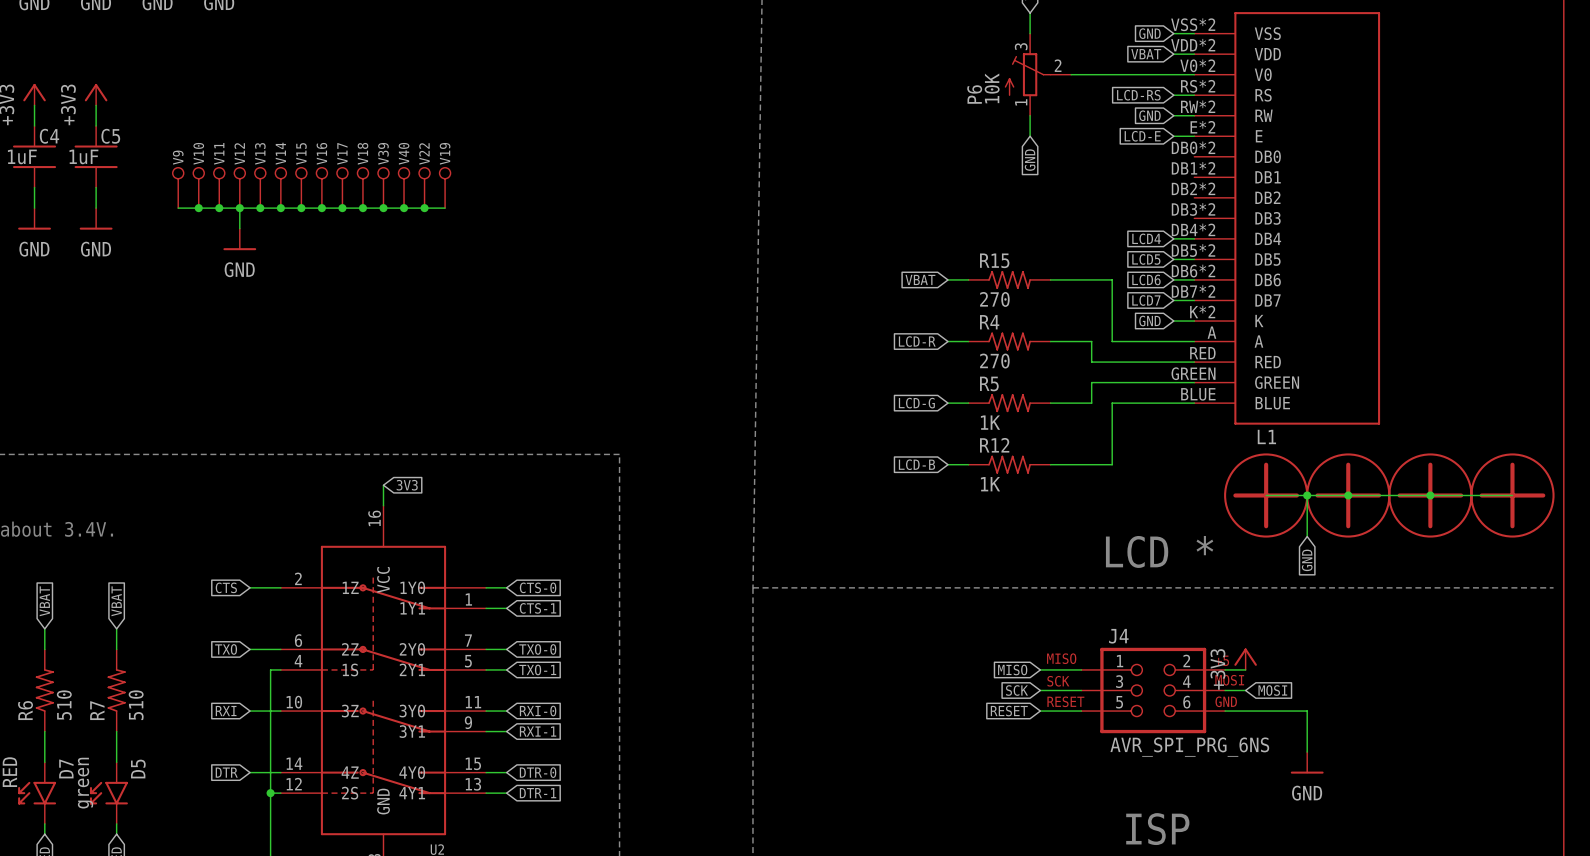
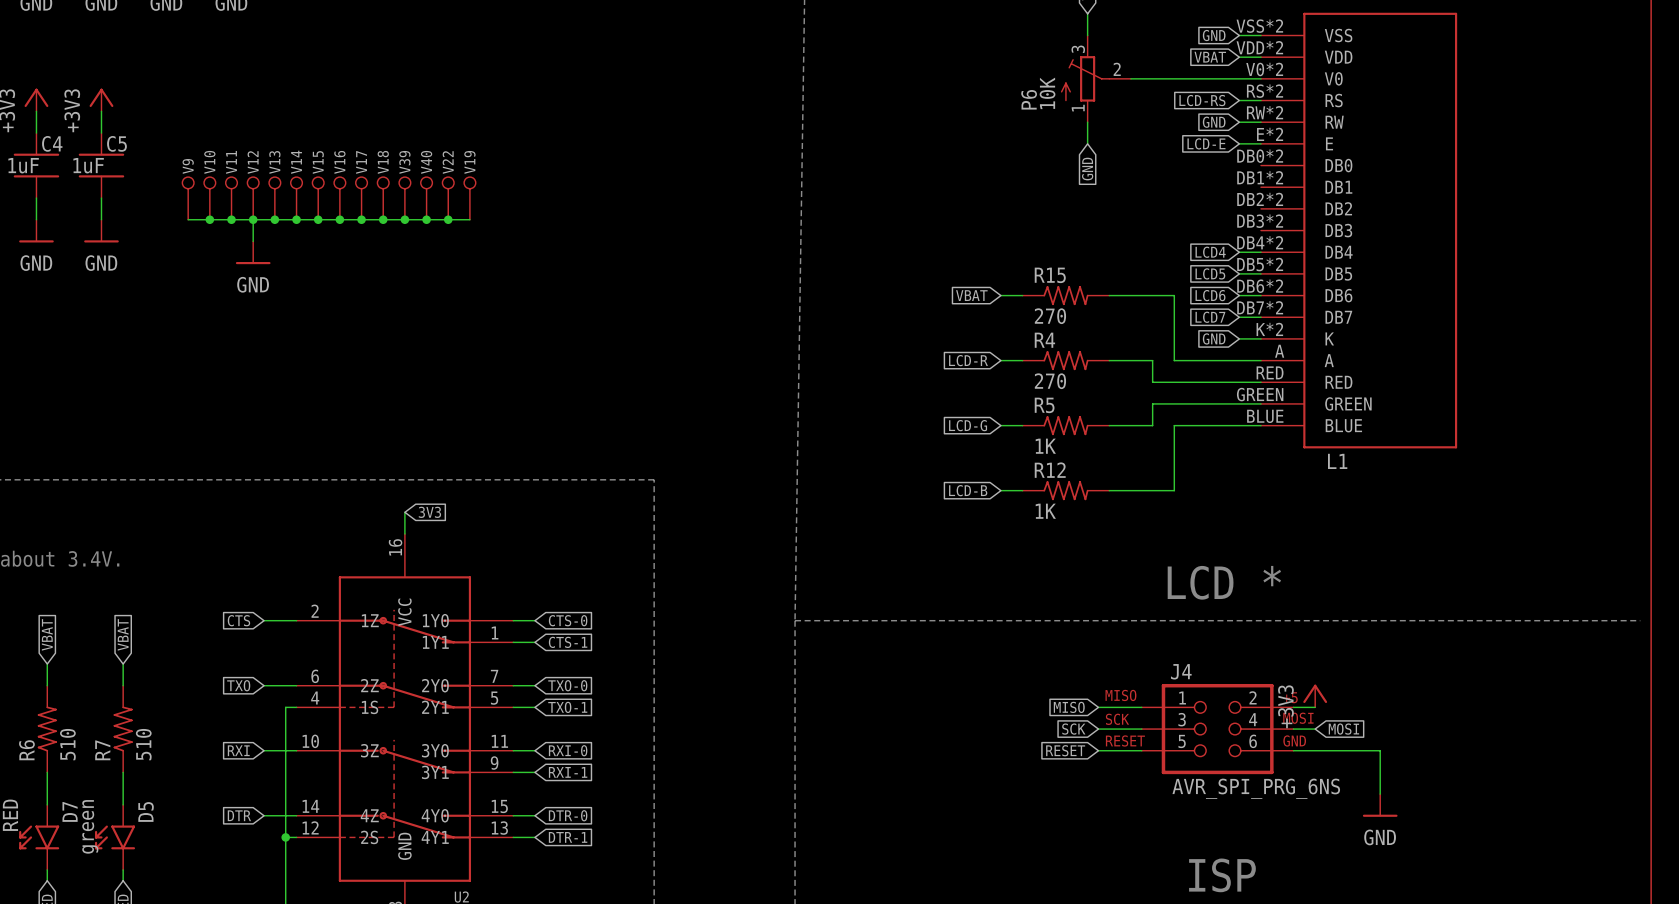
wire: (1266, 495) (1512, 495) -> none
part: (1266, 495) -> none
wire: (1307, 495) (1307, 536) -> none
junction: (1307, 495) -> none
part: (1348, 495) -> none
junction: (1348, 495) -> none
part: (1430, 495) -> none
junction: (1430, 495) -> none
part: (1512, 495) -> none
global label: GND (1307, 560) -> none

